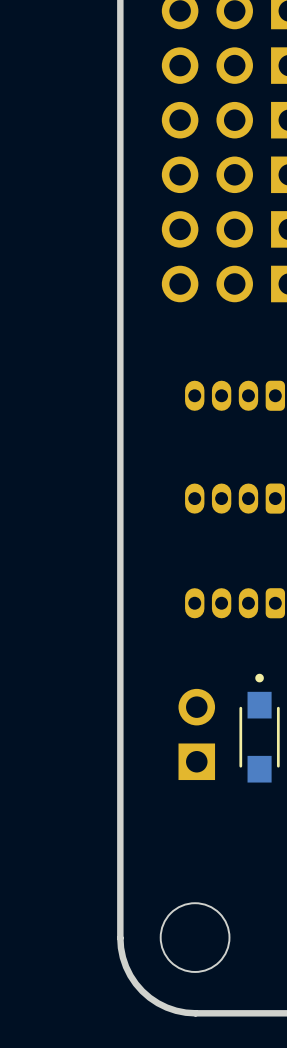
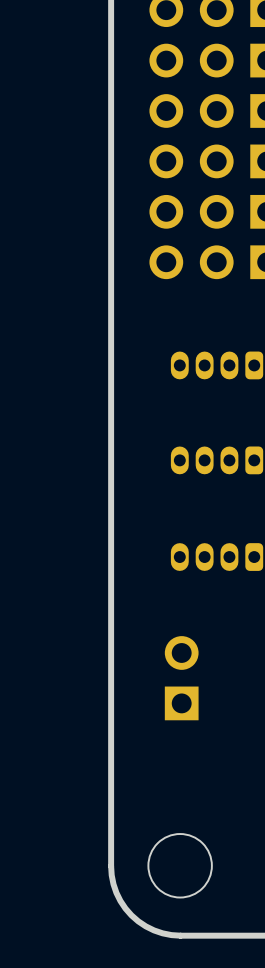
part: (259, 728) -> none

